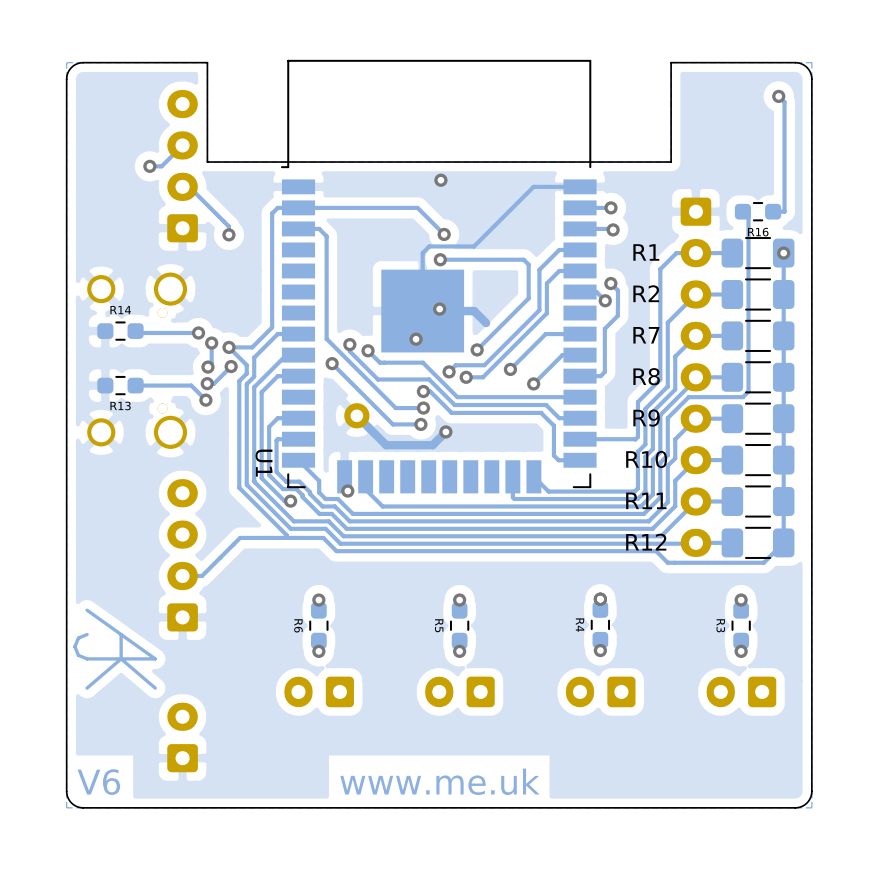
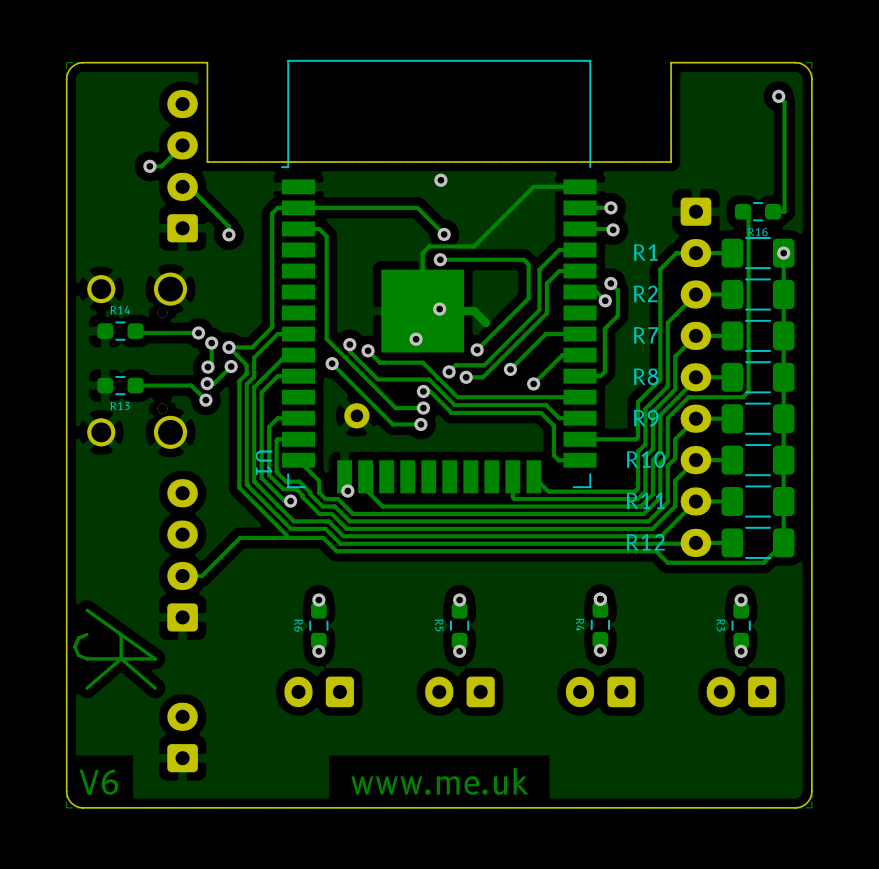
track: (356, 415) (386, 445) (432, 445) (445, 431) -> none
via: (445, 431) -> none

